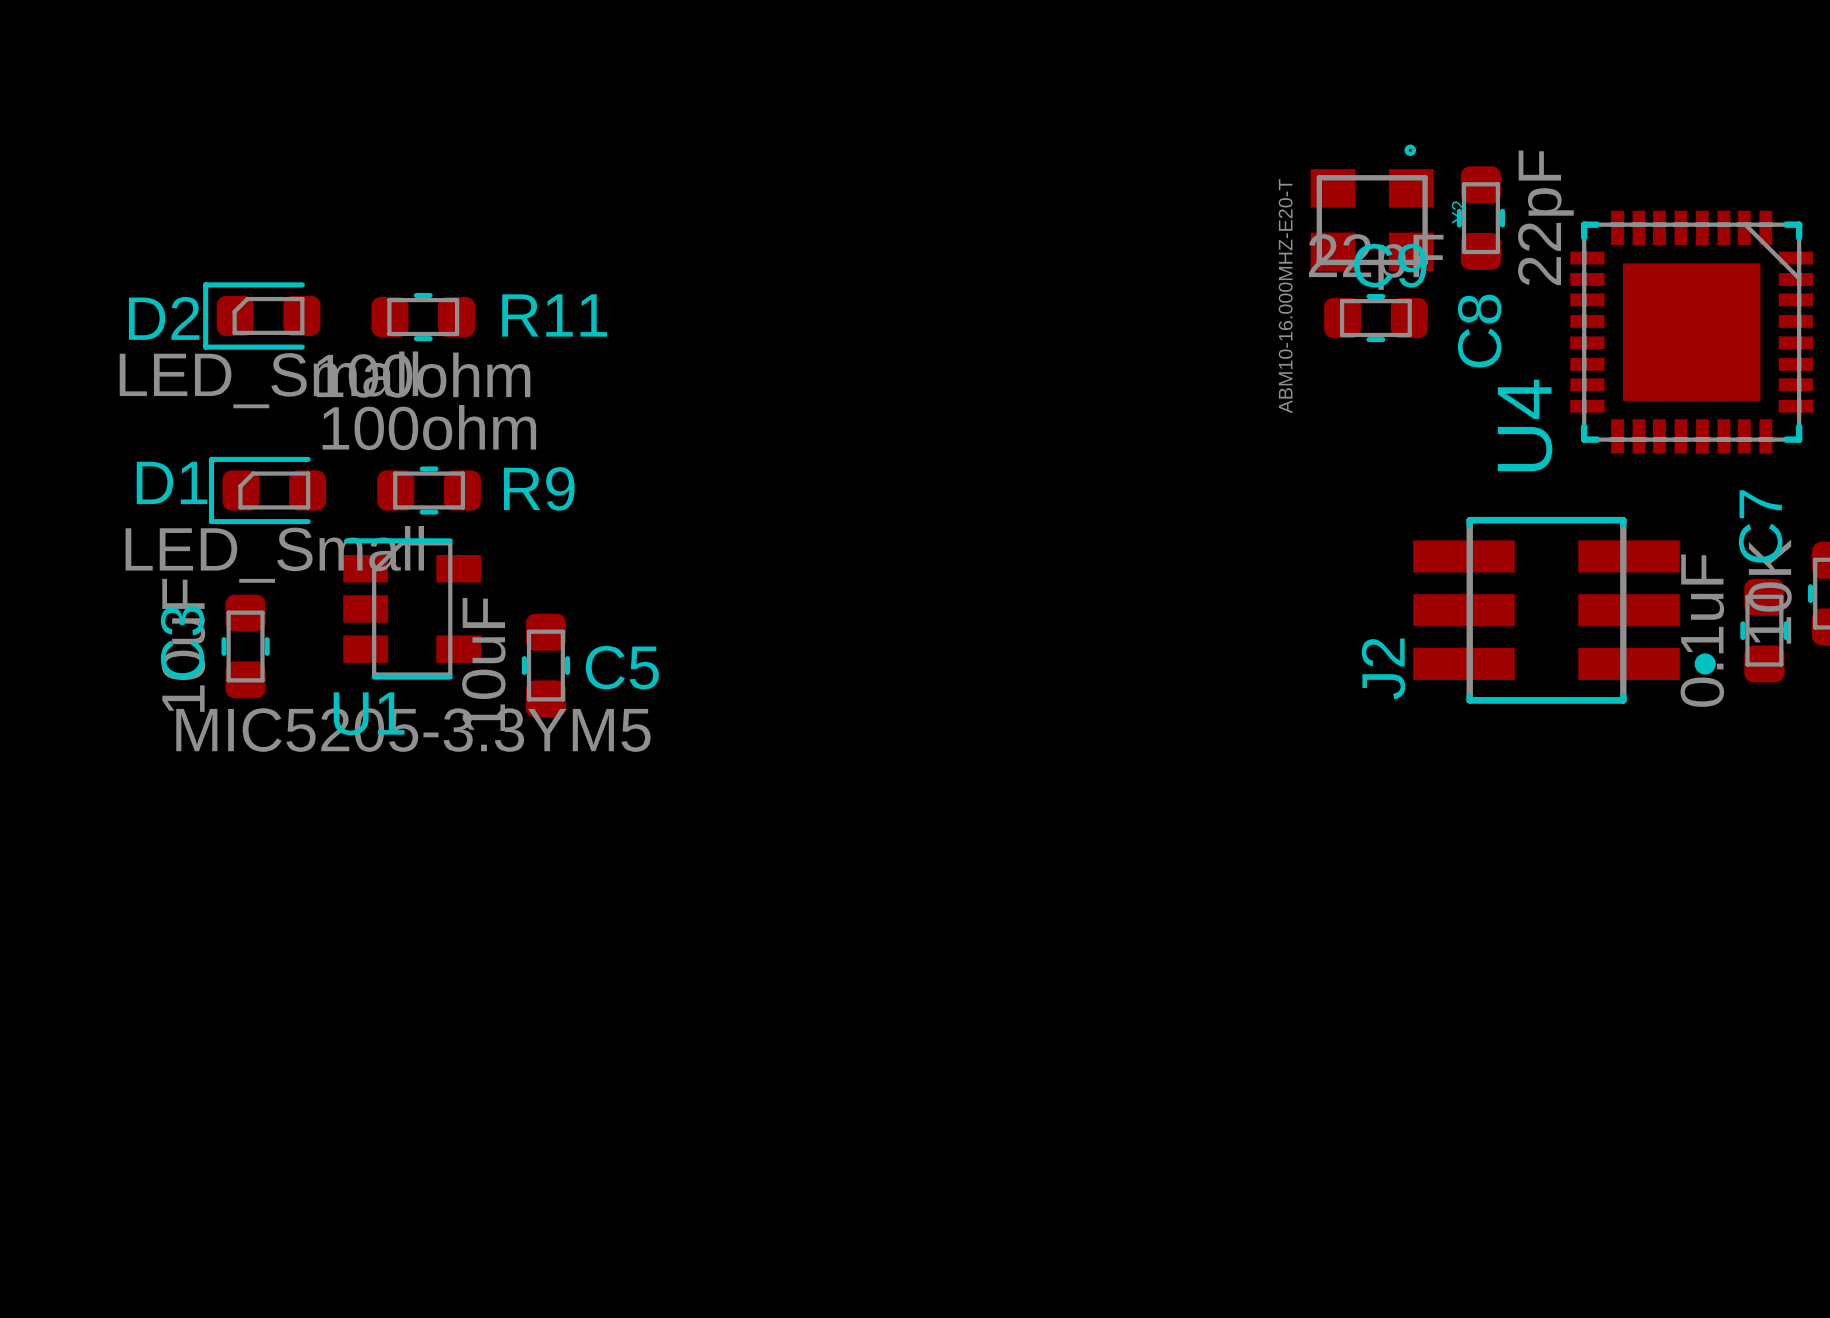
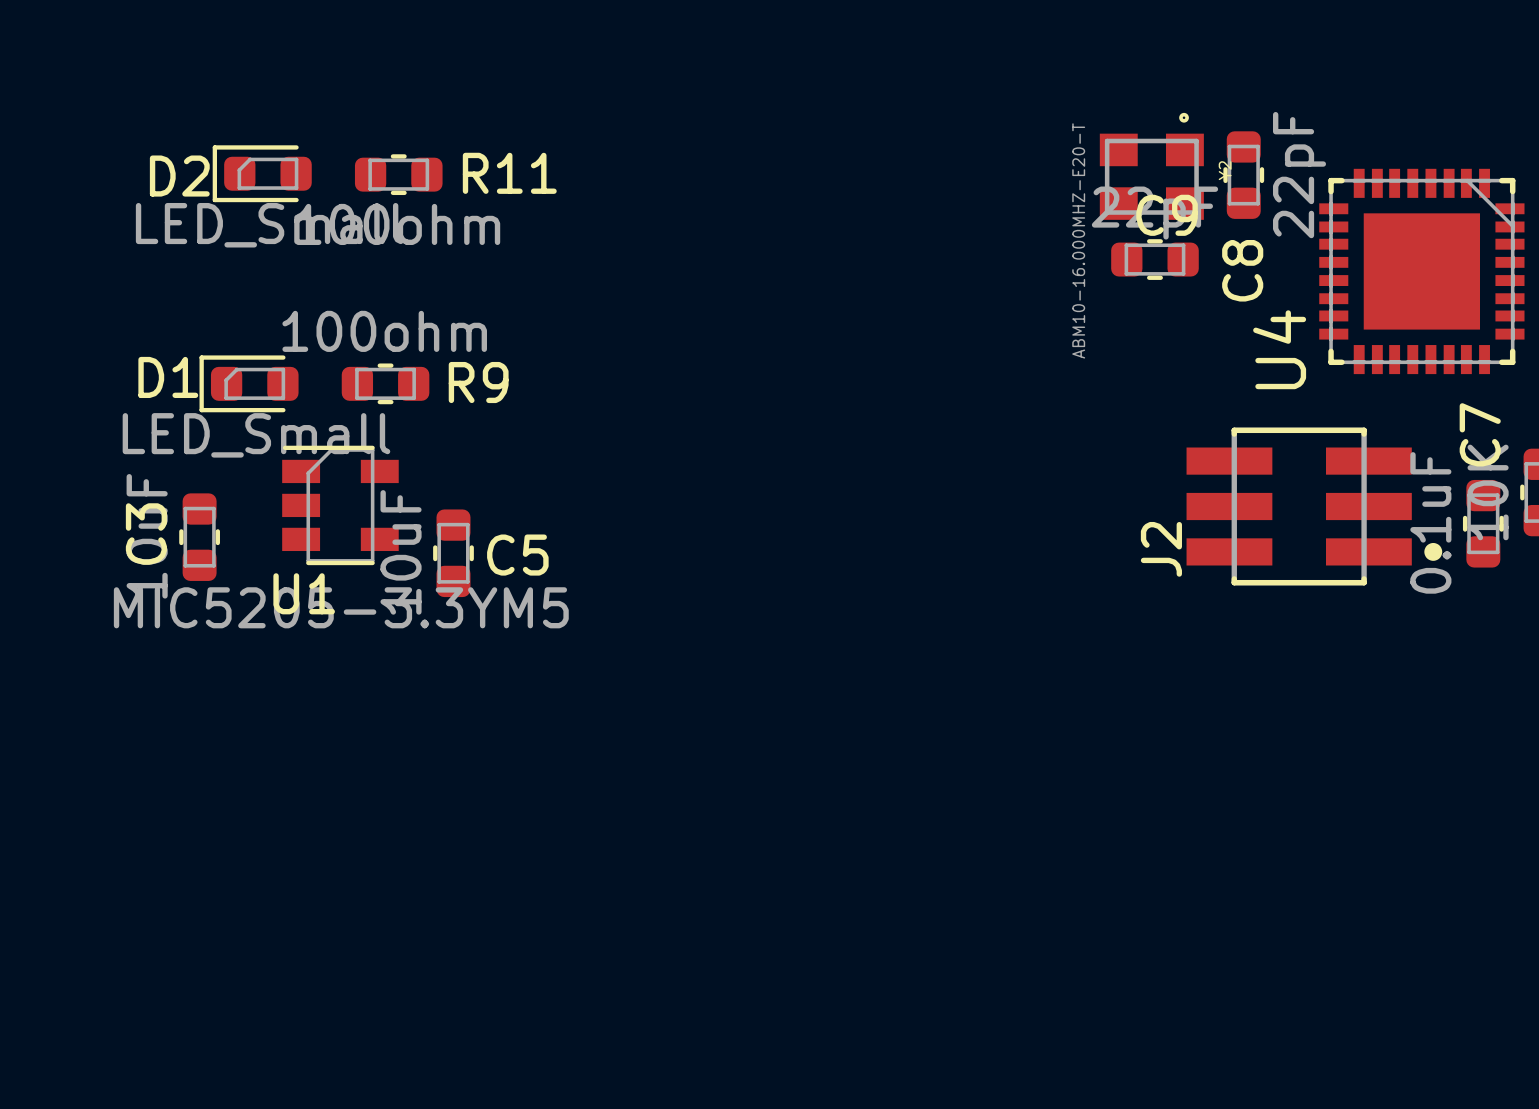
D2 position: (261, 315) -> (262, 173)
R11 position: (423, 317) -> (398, 174)
D1 position: (267, 490) -> (249, 383)
R9 position: (429, 490) -> (385, 383)

